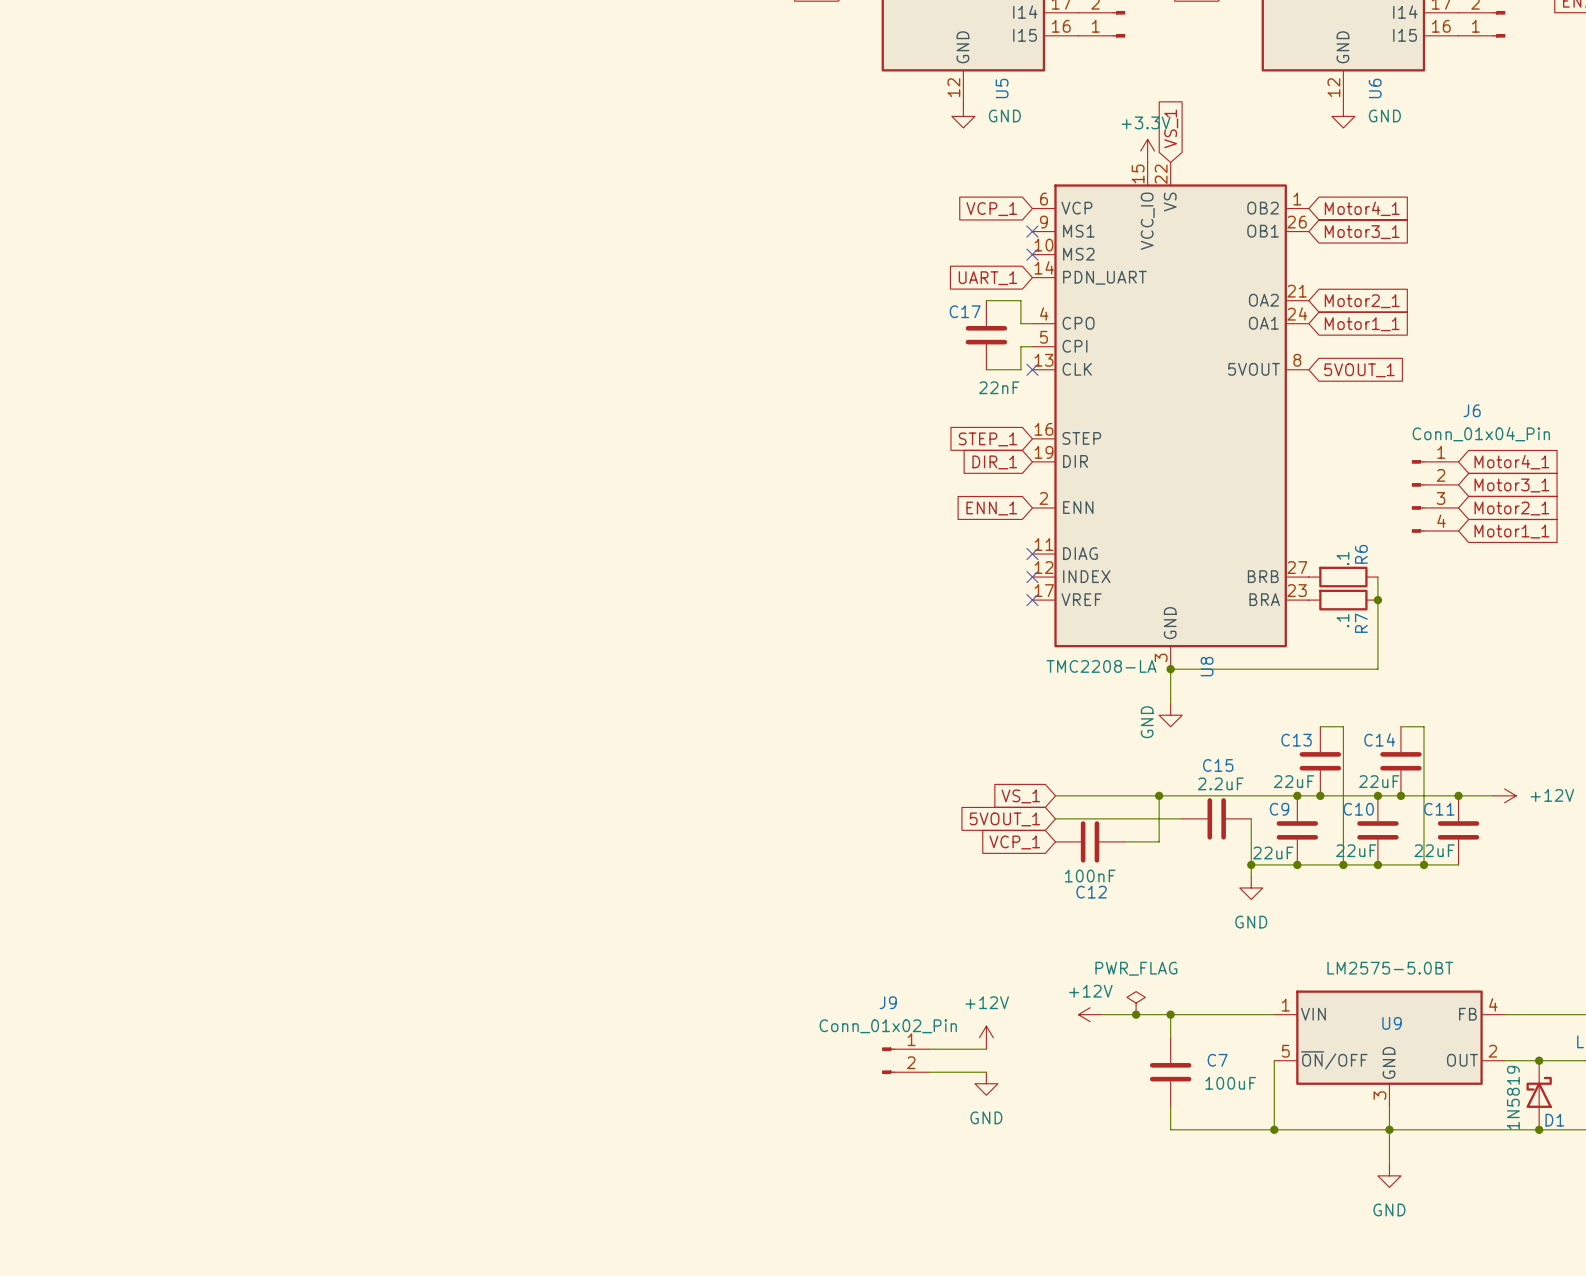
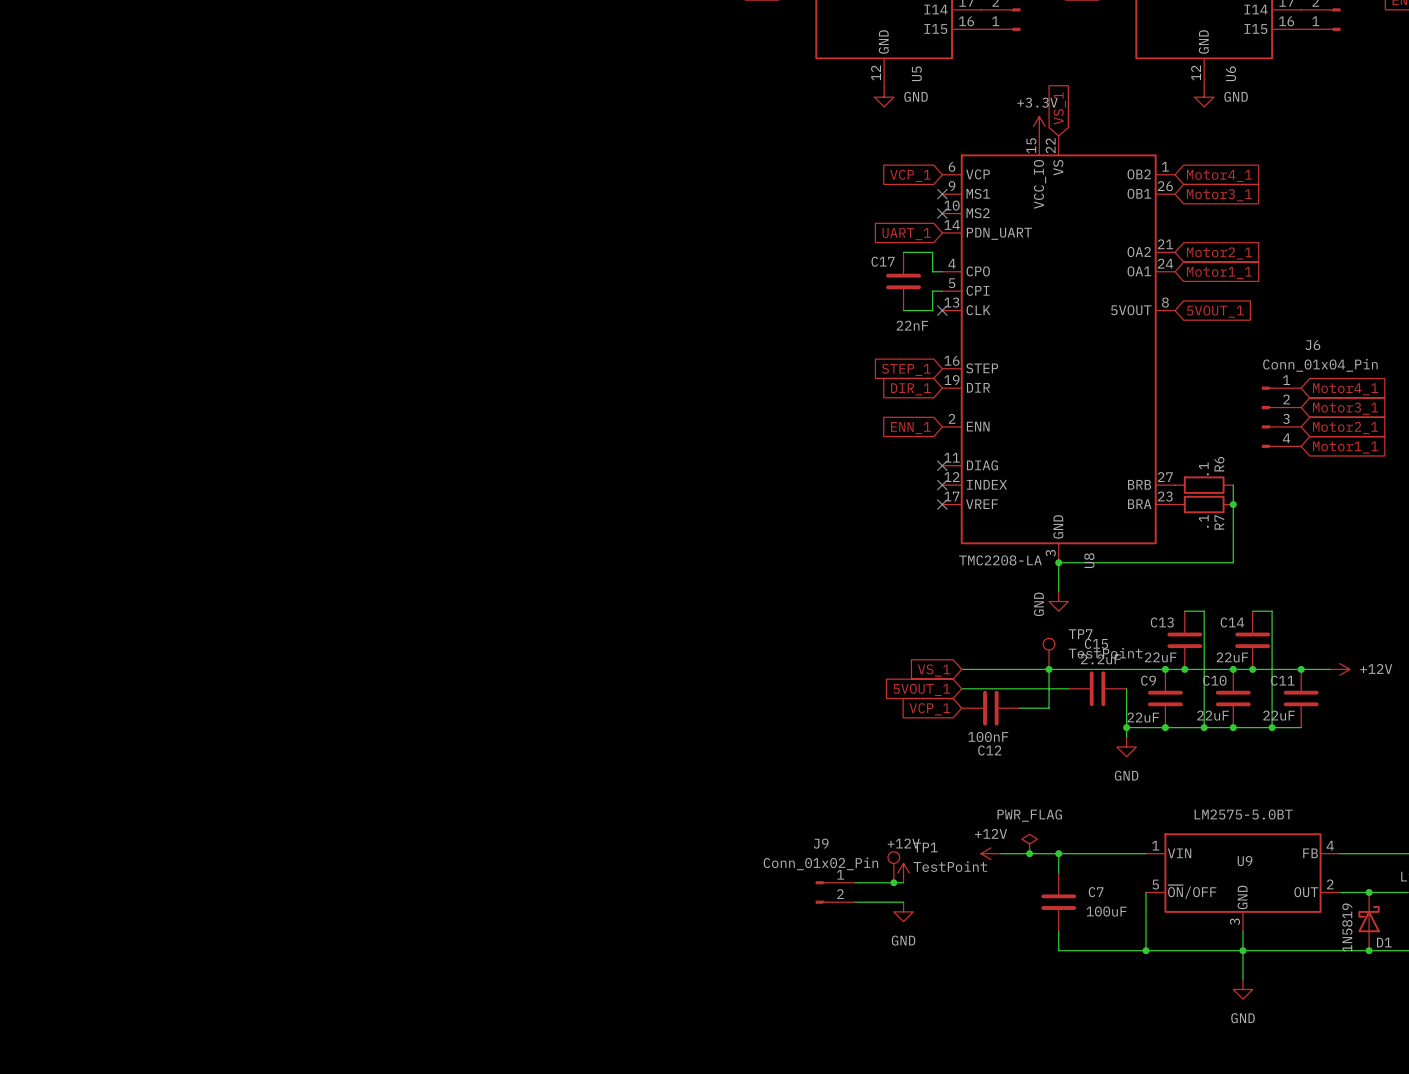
TP7: none -> TestPoint (1049, 653)
TP1: none -> TestPoint (893, 867)
junction: none -> (893, 882)

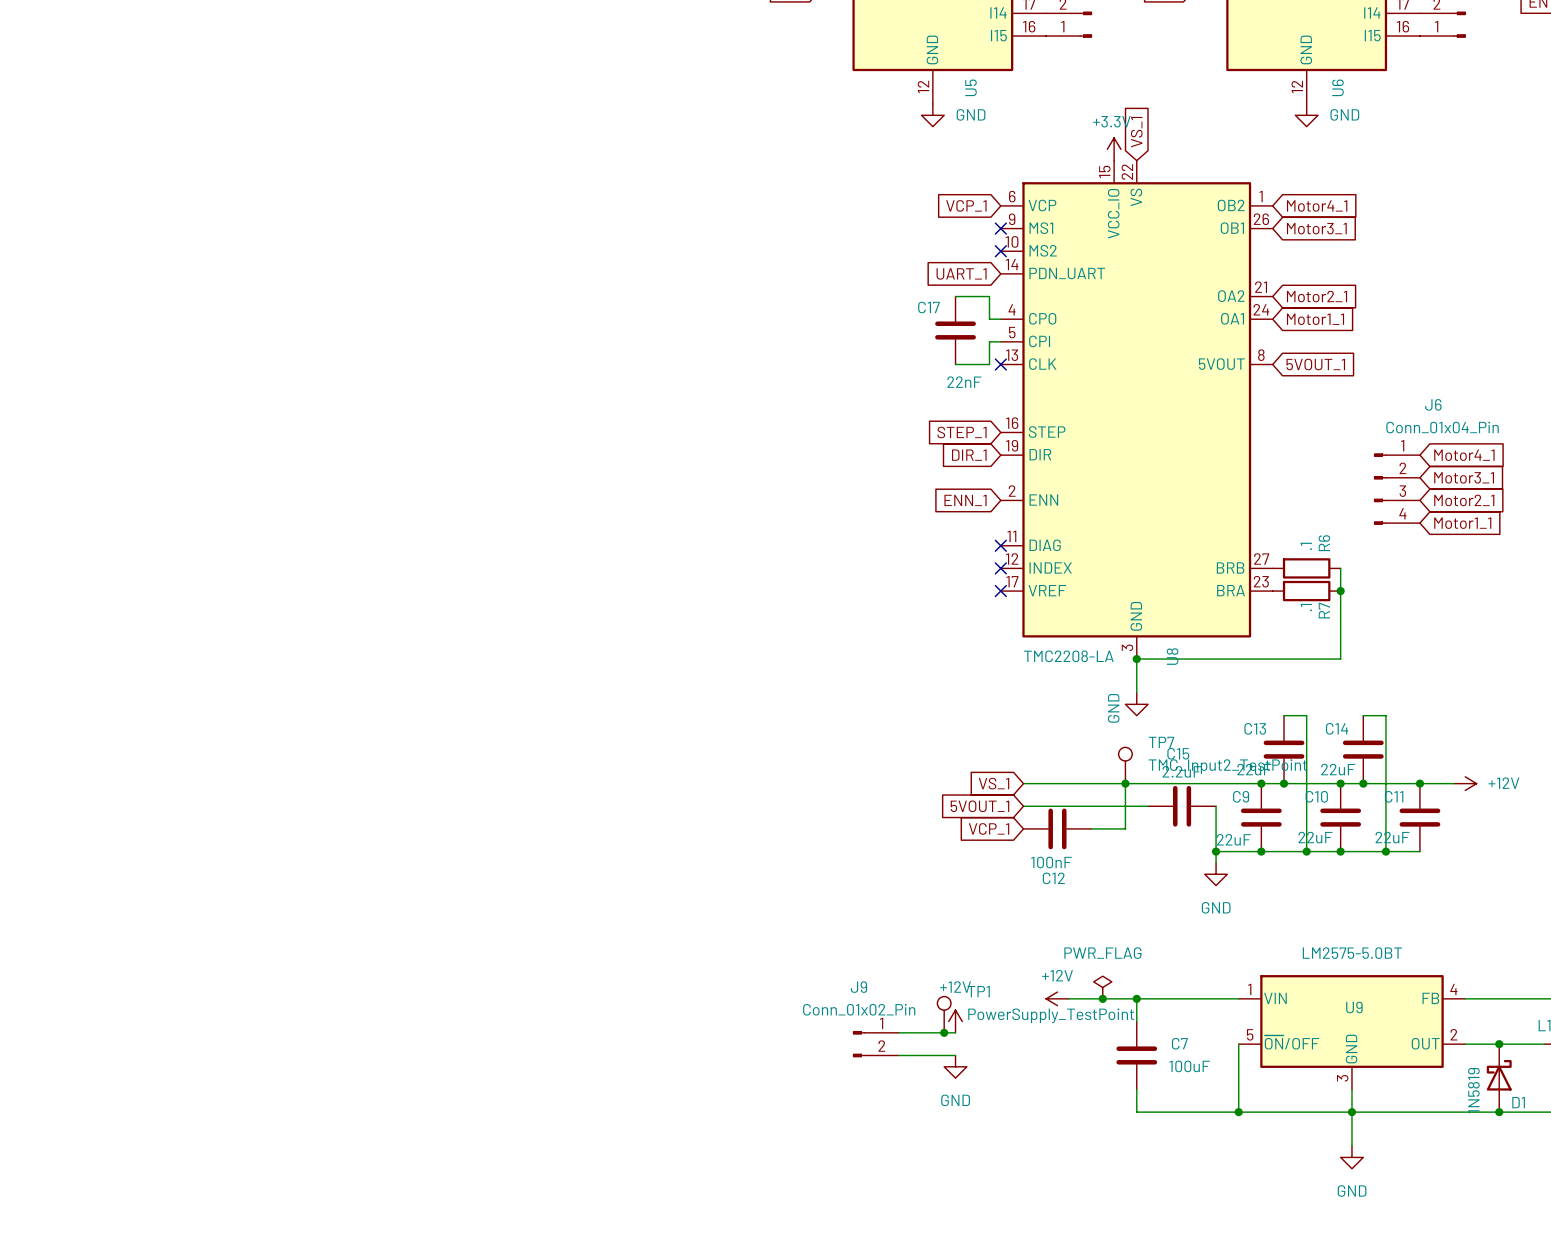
TP7 value: TestPoint (1105, 653) -> TMC_Input2_TestPoint (1227, 766)
TP1 value: TestPoint (950, 866) -> PowerSupply_TestPoint (1051, 1015)

